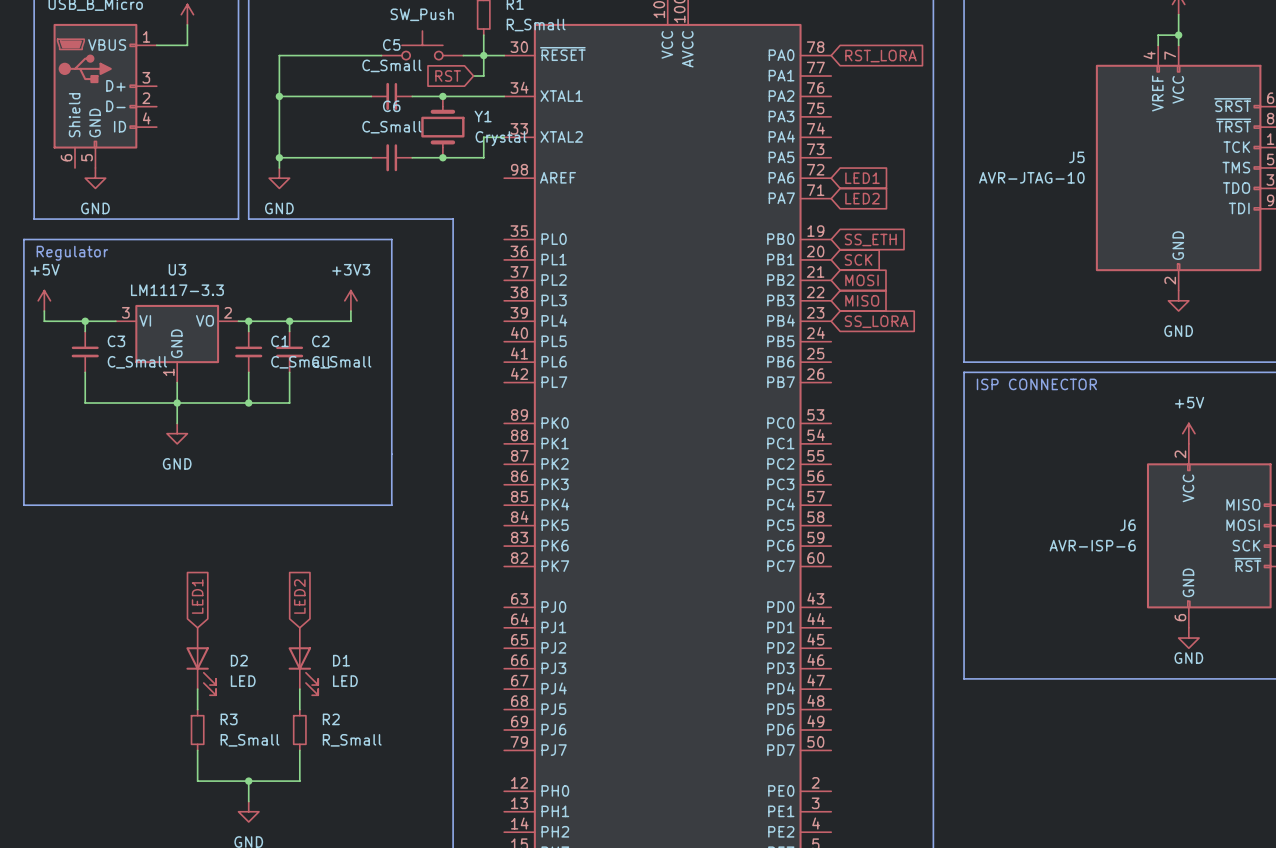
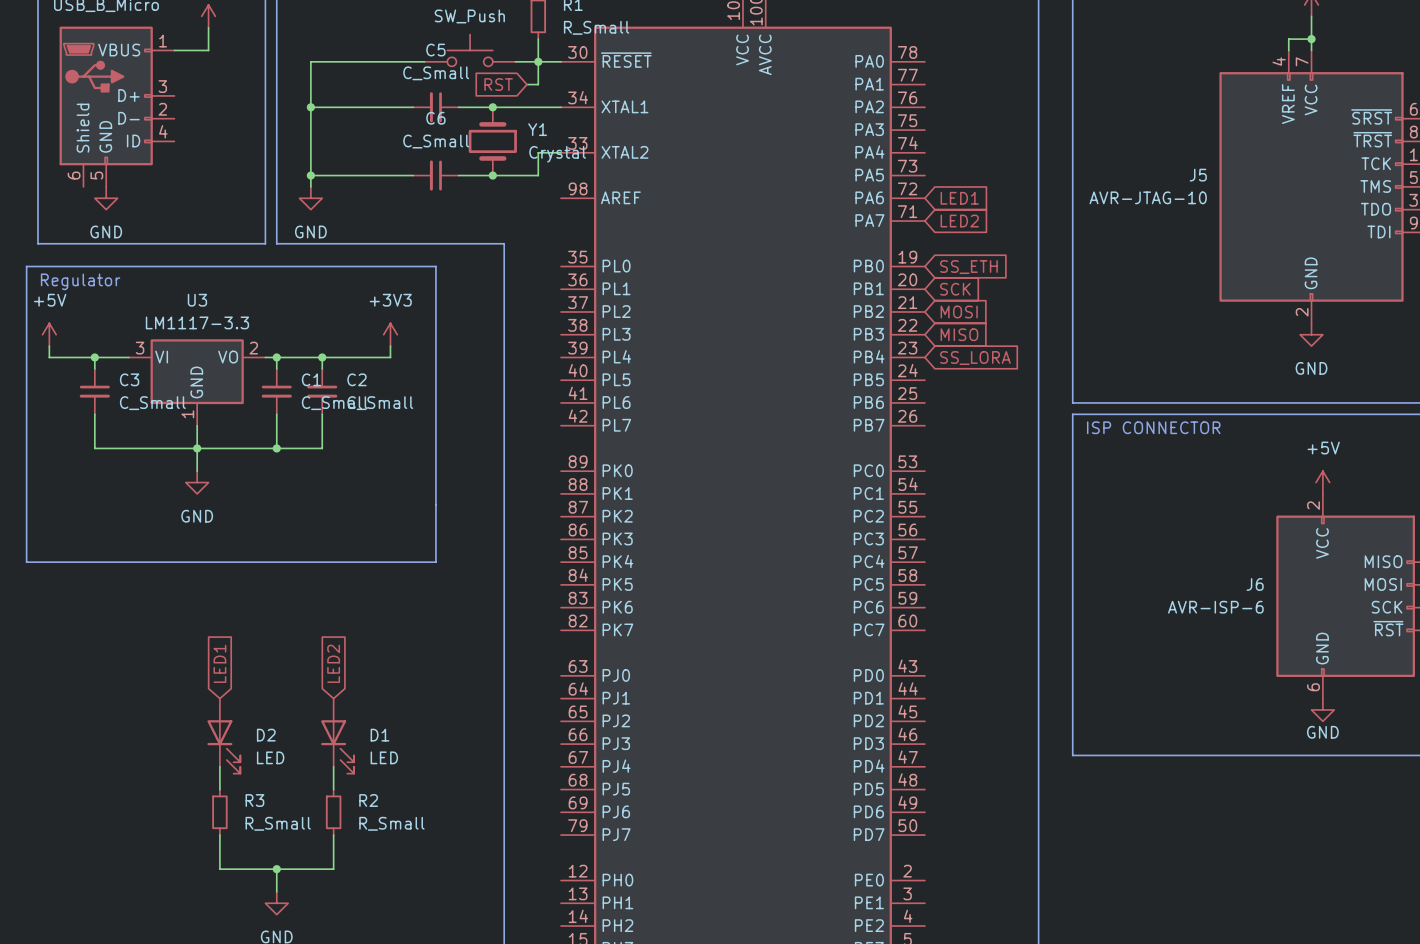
global label: RST_LORA (880, 56) -> none

